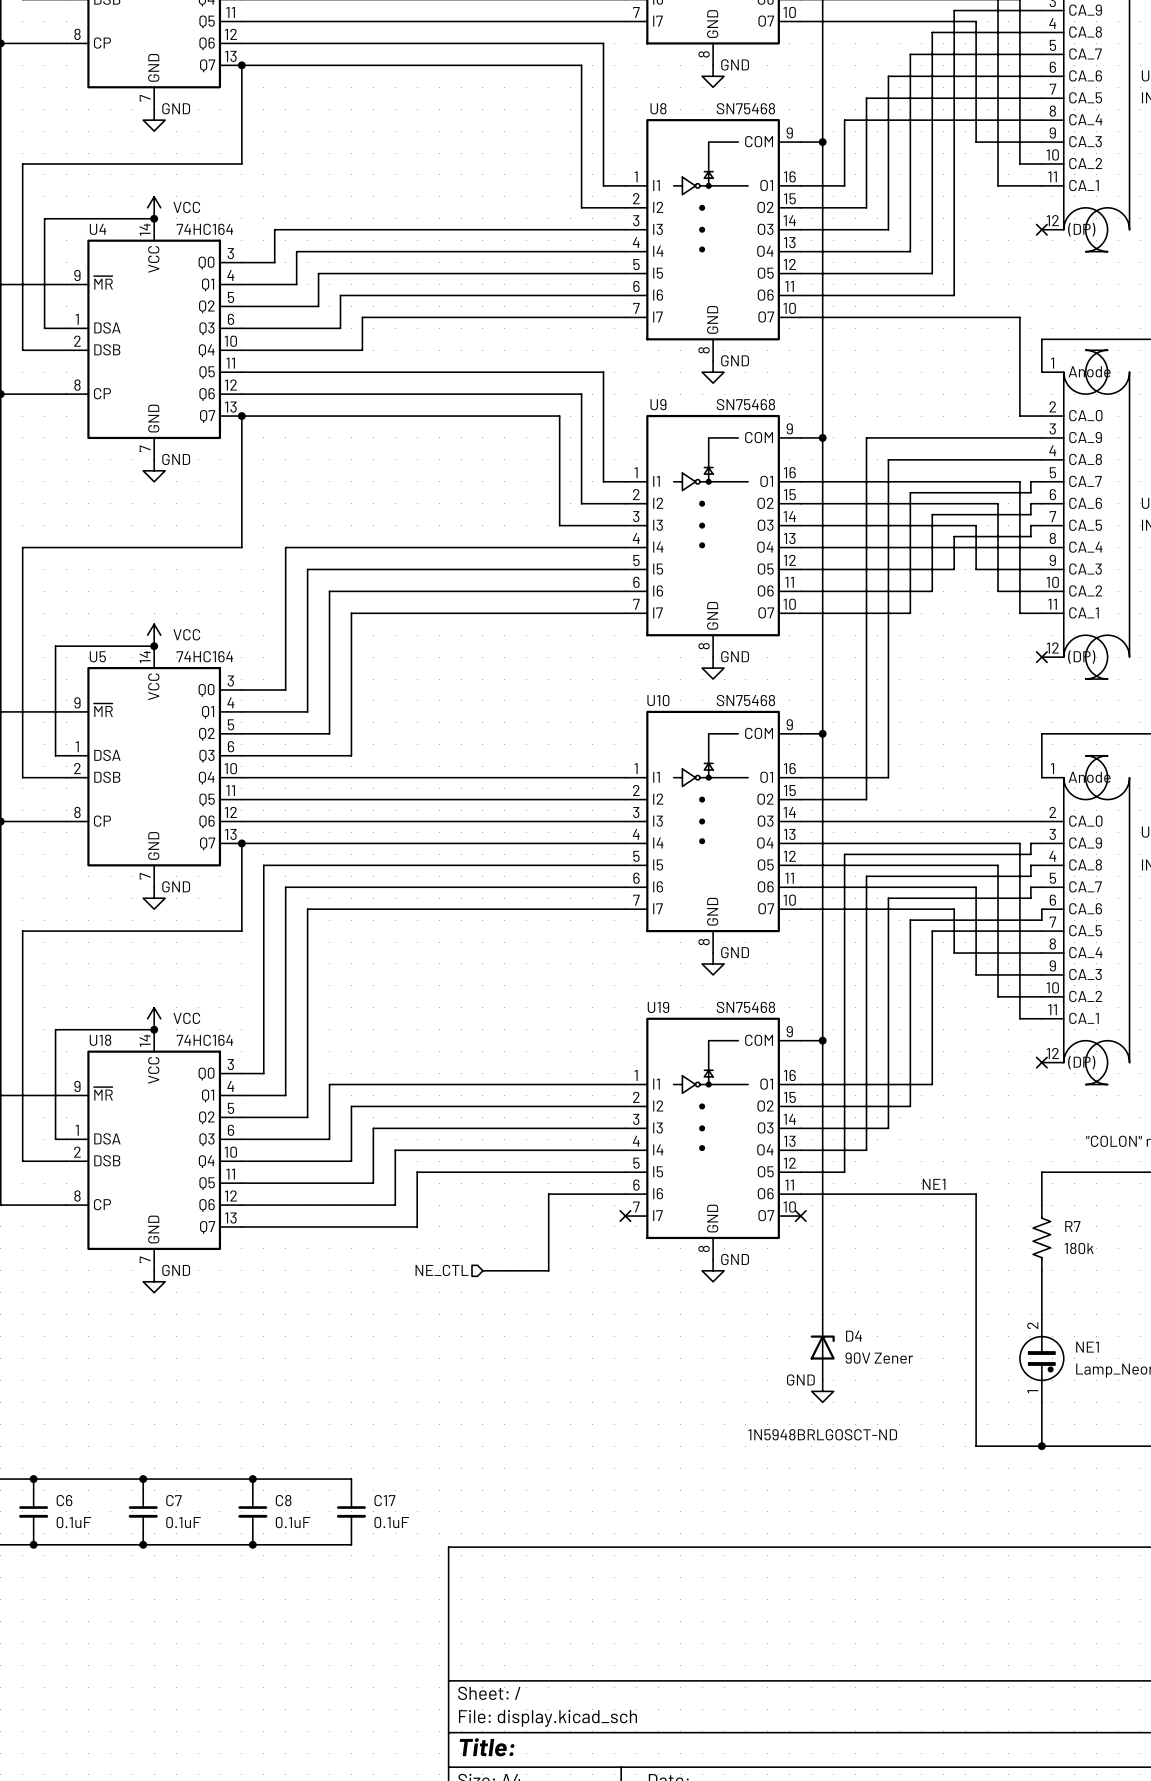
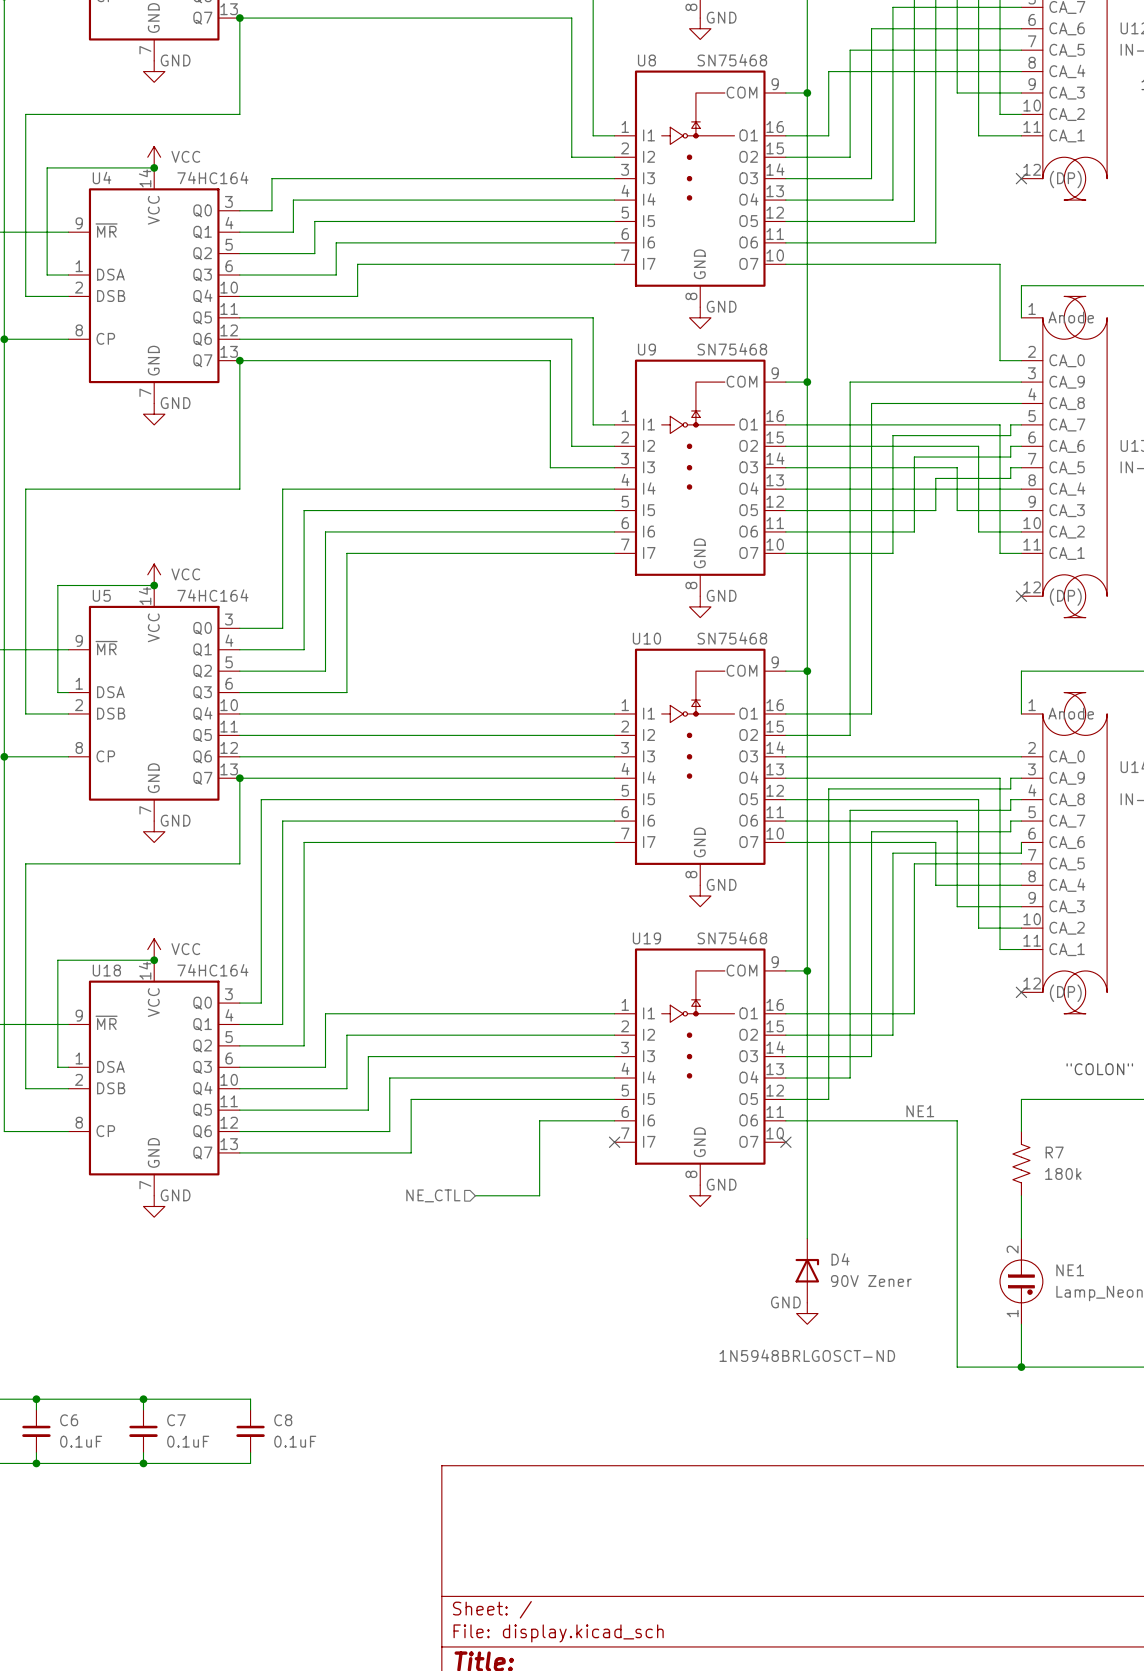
wire: (252, 1479) (351, 1479) (351, 1490) -> none
junction: (252, 1479) -> none
C17: 0.1uF (351, 1511) -> none
wire: (351, 1533) (351, 1544) (252, 1544) -> none
junction: (252, 1544) -> none

